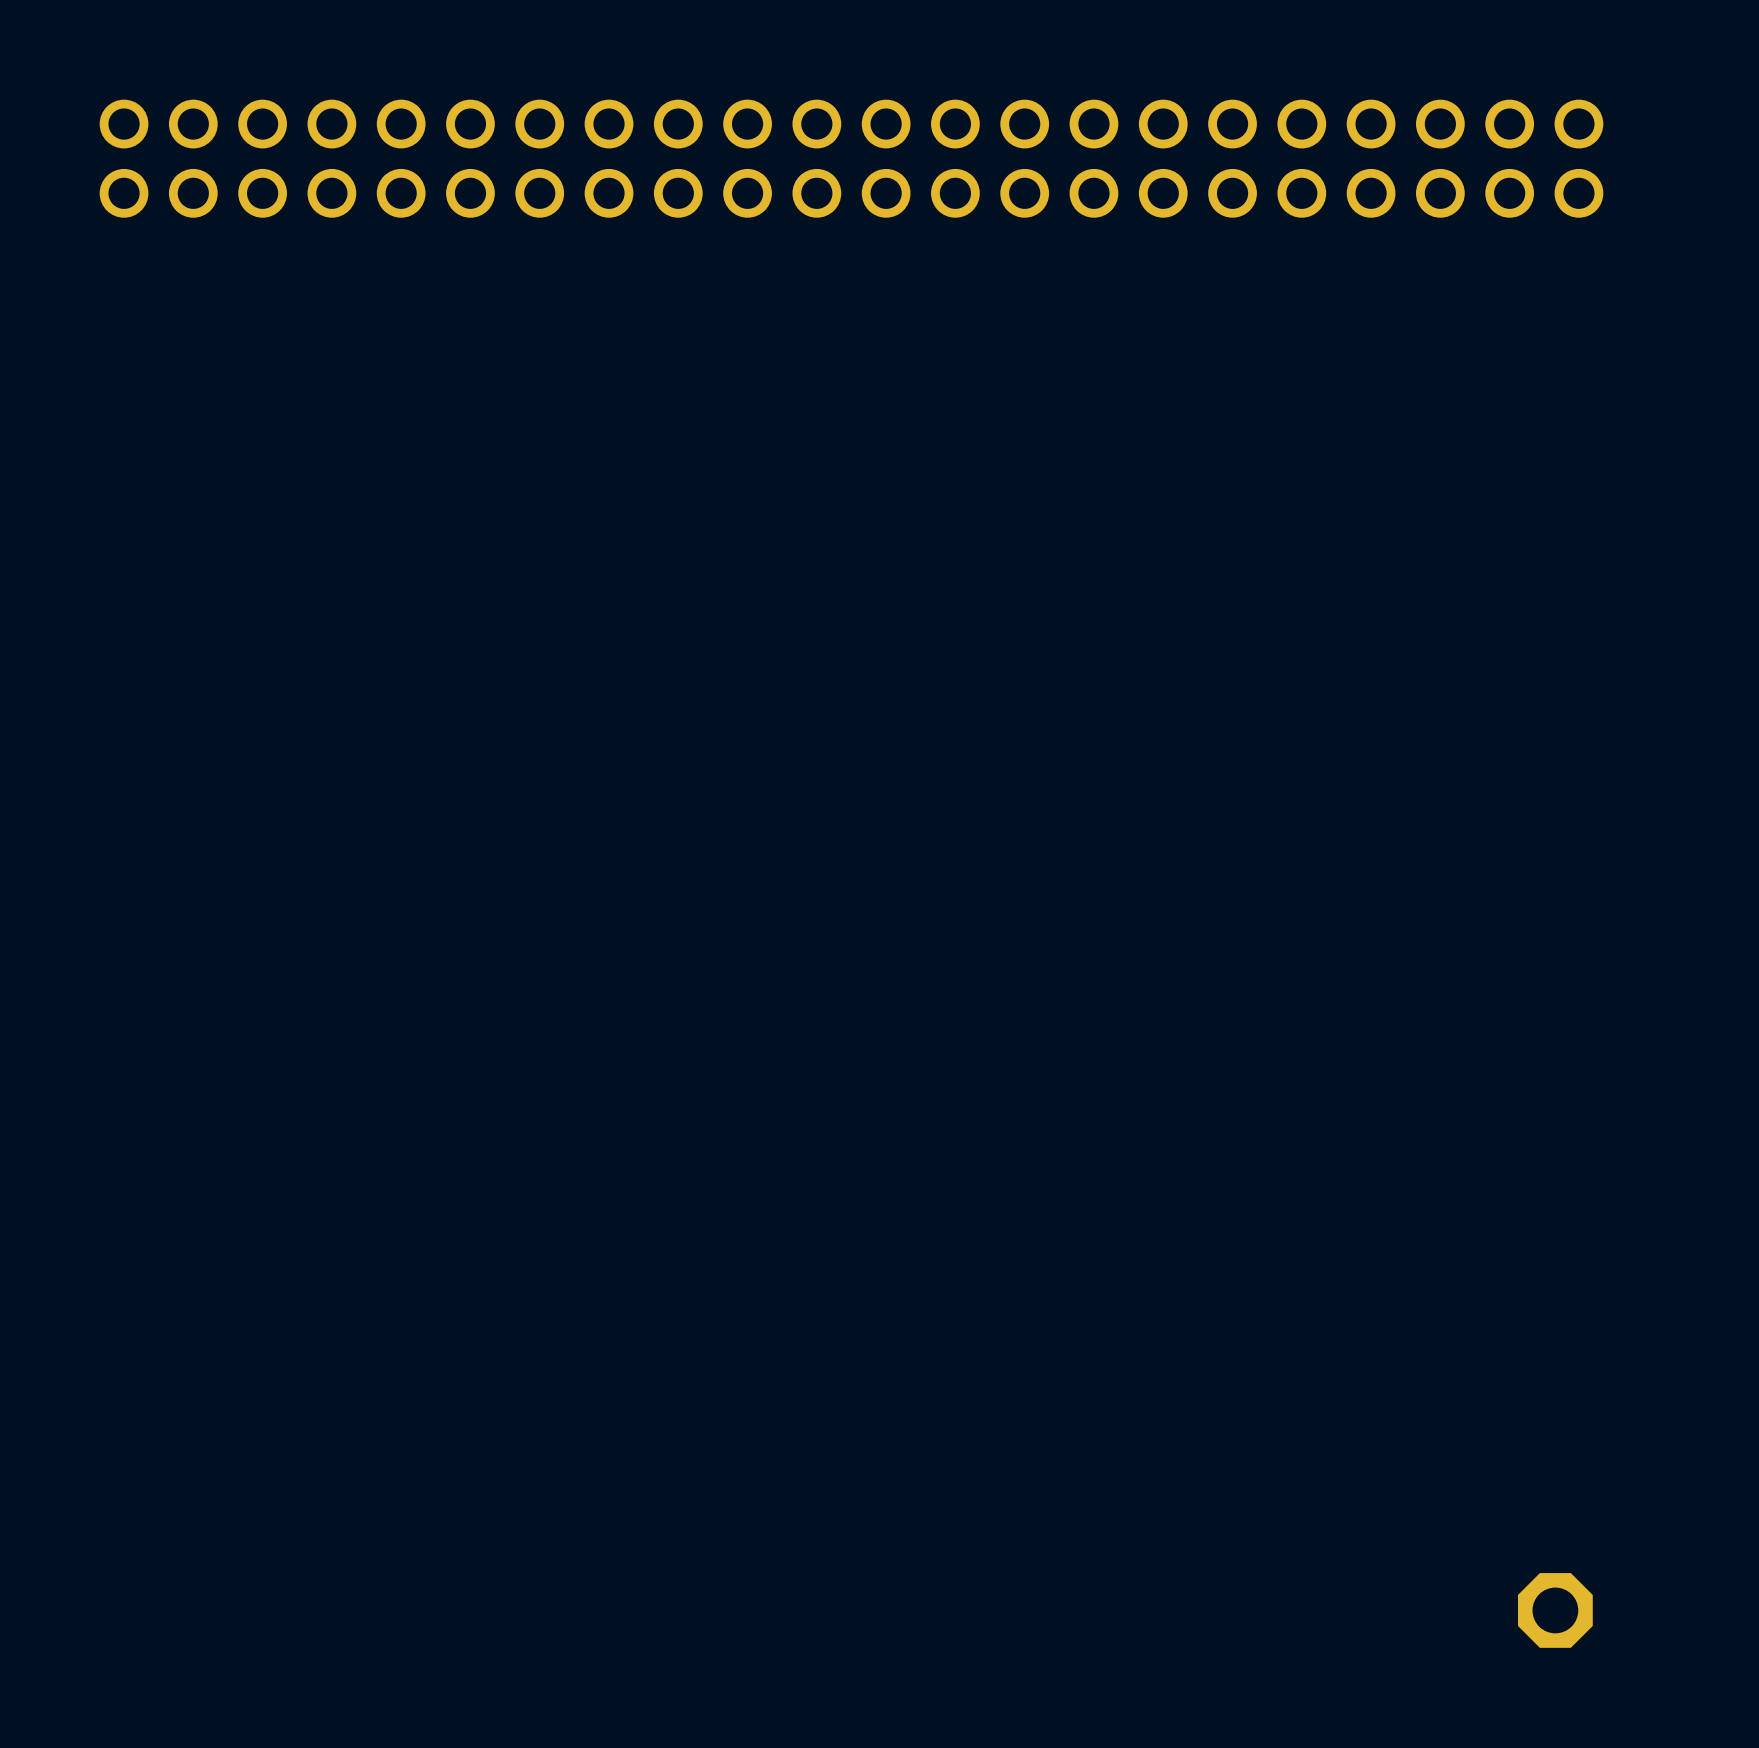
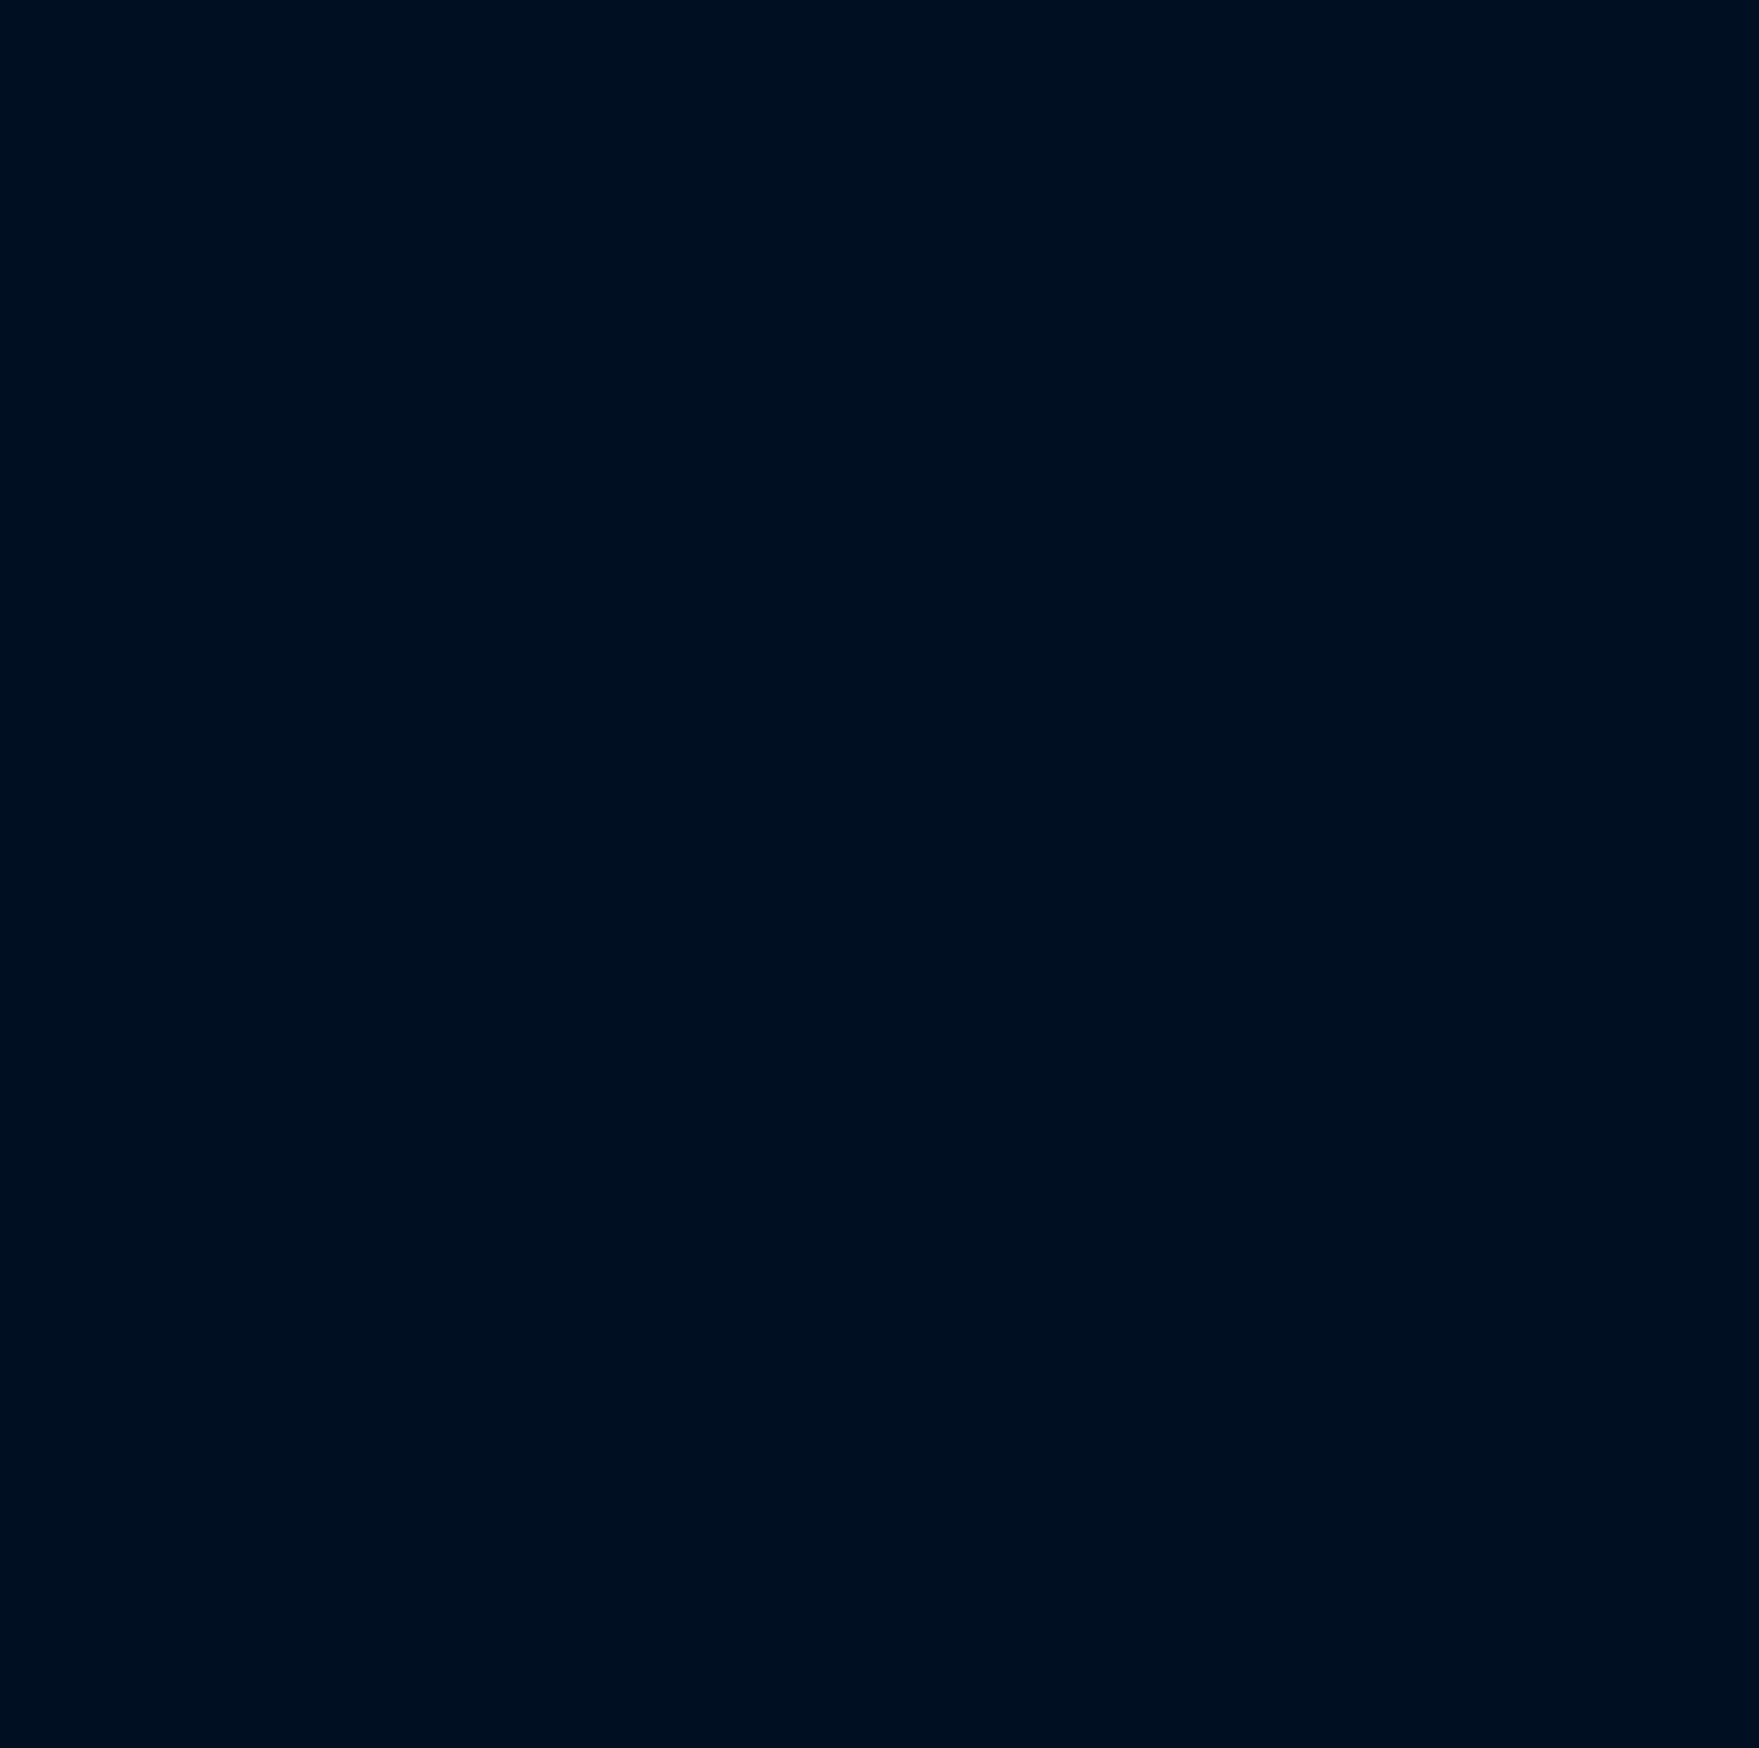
part: (851, 158) -> none
part: (1555, 1610) -> none

